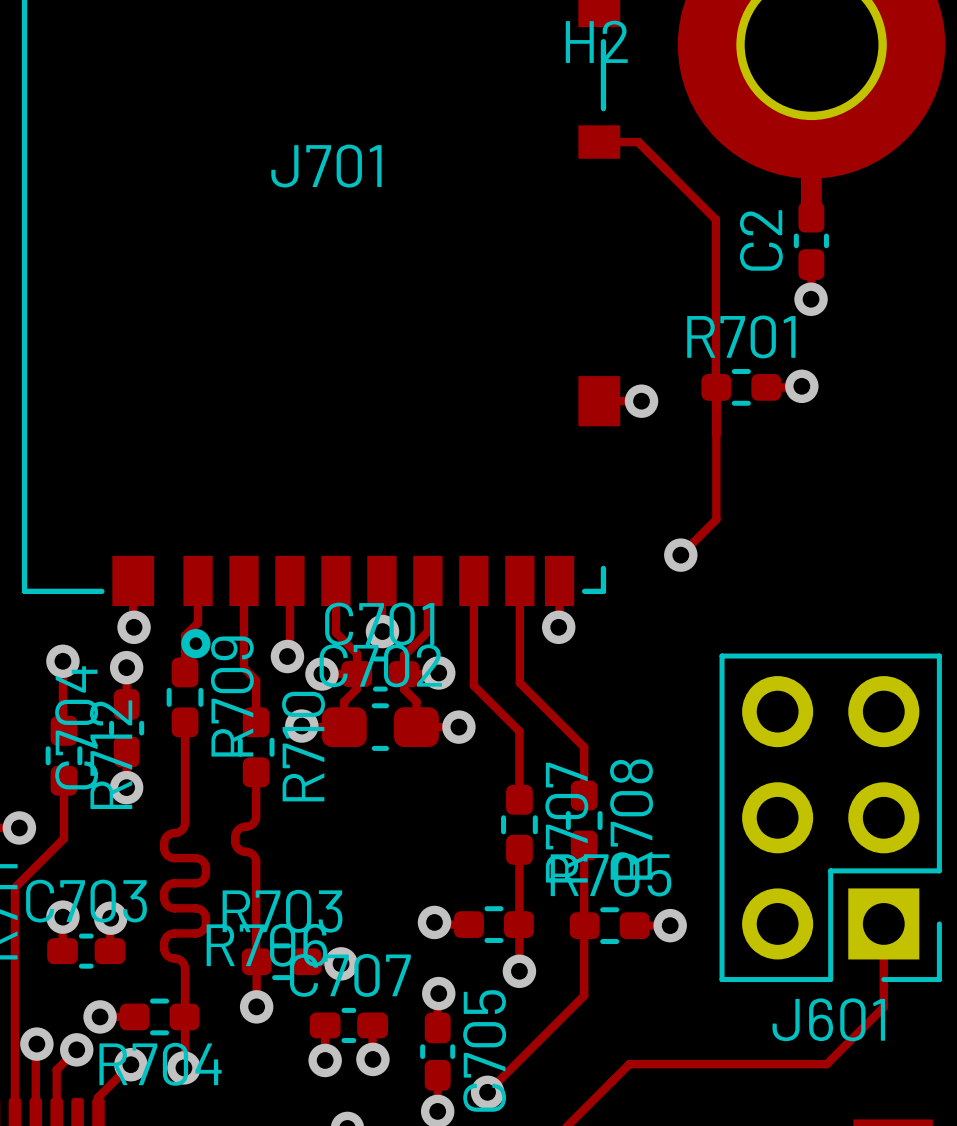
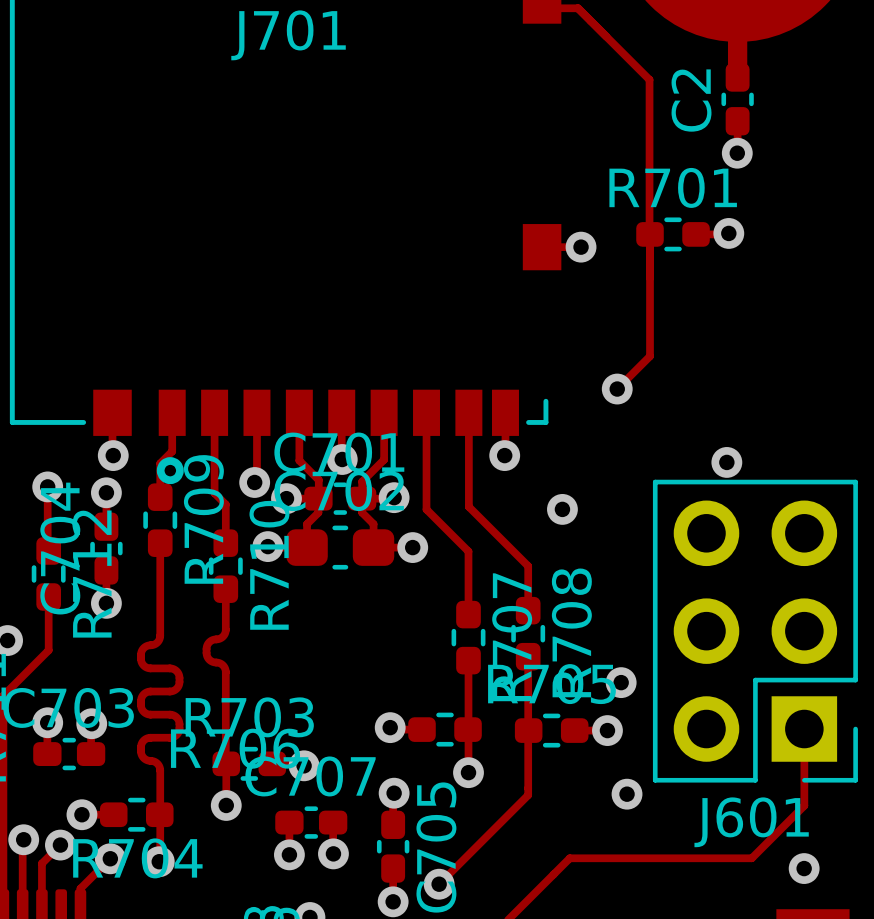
via: none -> (726, 462)
via: none -> (562, 509)
via: none -> (621, 682)
via: none -> (627, 794)
via: none -> (804, 868)

